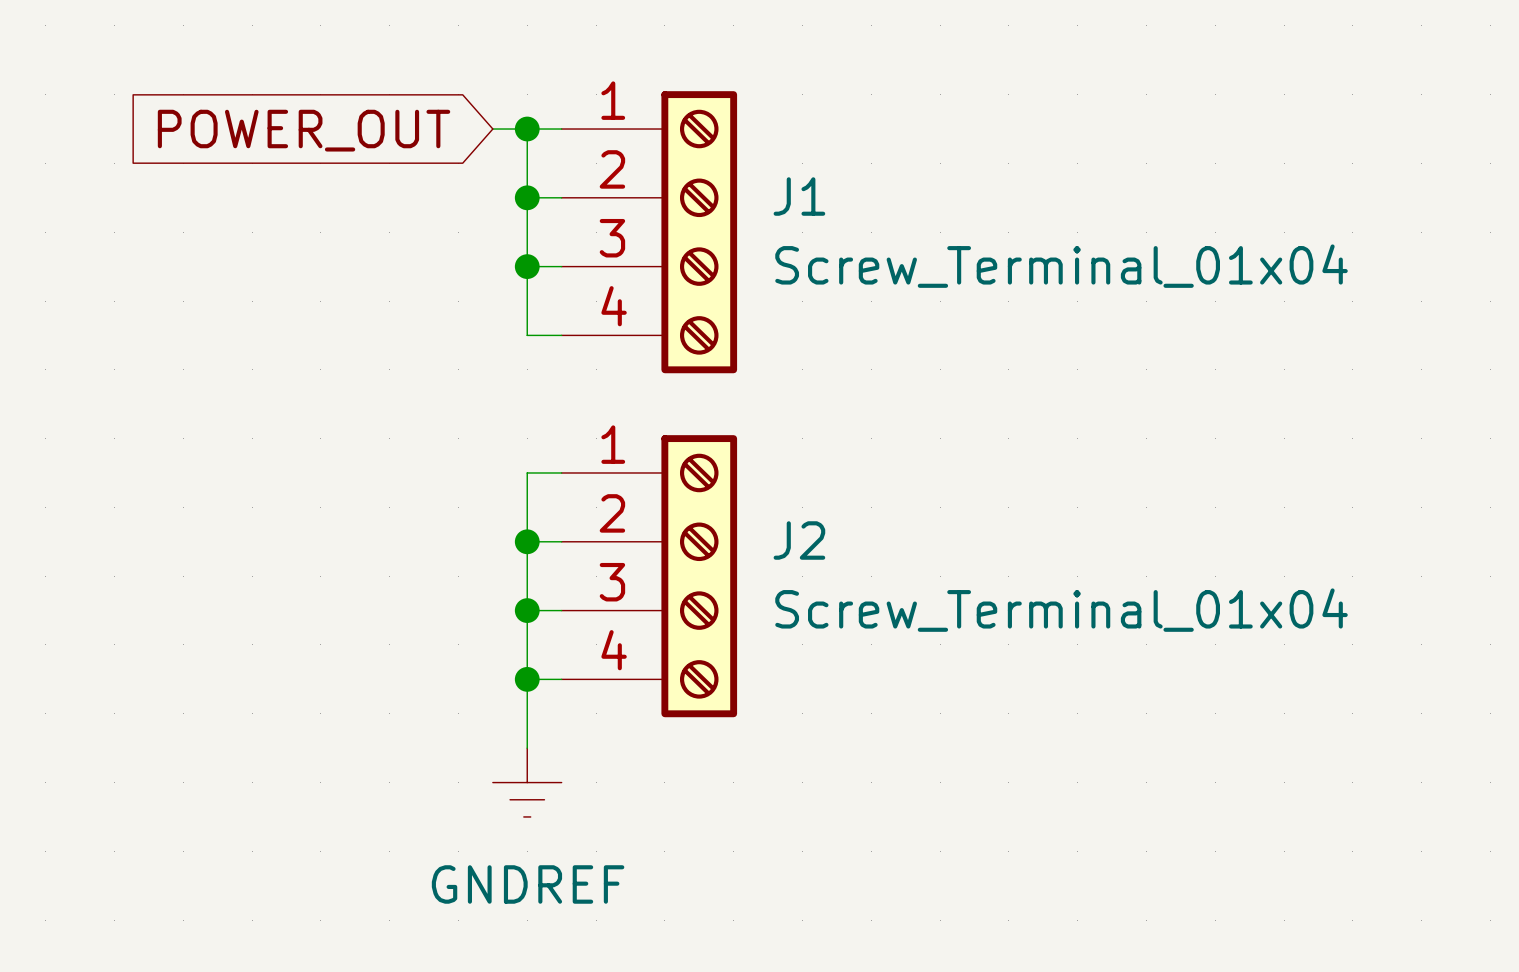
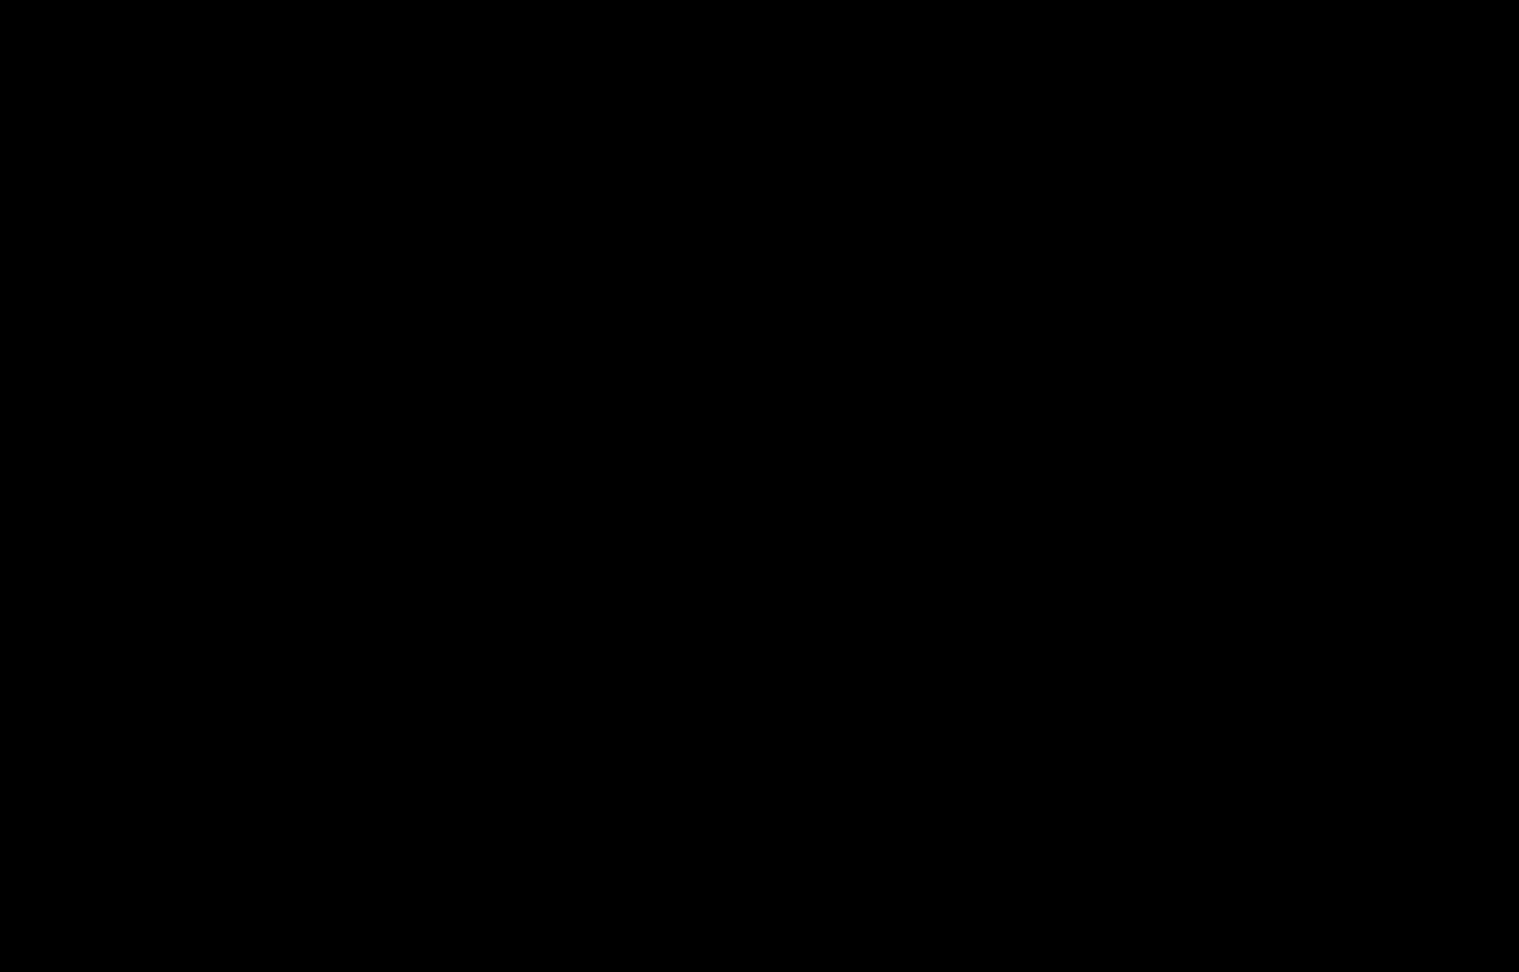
wire: (492, 129) (561, 129) -> none
wire: (527, 129) (527, 335) (561, 335) -> none
junction: (527, 129) -> none
global label: POWER_OUT (304, 130) -> none
wire: (527, 197) (561, 197) -> none
junction: (527, 197) -> none
J1: Screw_Terminal_01x04 (649, 232) -> none
wire: (527, 266) (561, 266) -> none
junction: (527, 266) -> none
wire: (561, 472) (527, 472) (527, 748) -> none
wire: (527, 541) (561, 541) -> none
junction: (527, 541) -> none
J2: Screw_Terminal_01x04 (649, 576) -> none
wire: (527, 610) (561, 610) -> none
junction: (527, 610) -> none
wire: (527, 679) (561, 679) -> none
junction: (527, 679) -> none
power symbol: GNDREF (527, 782) -> none

